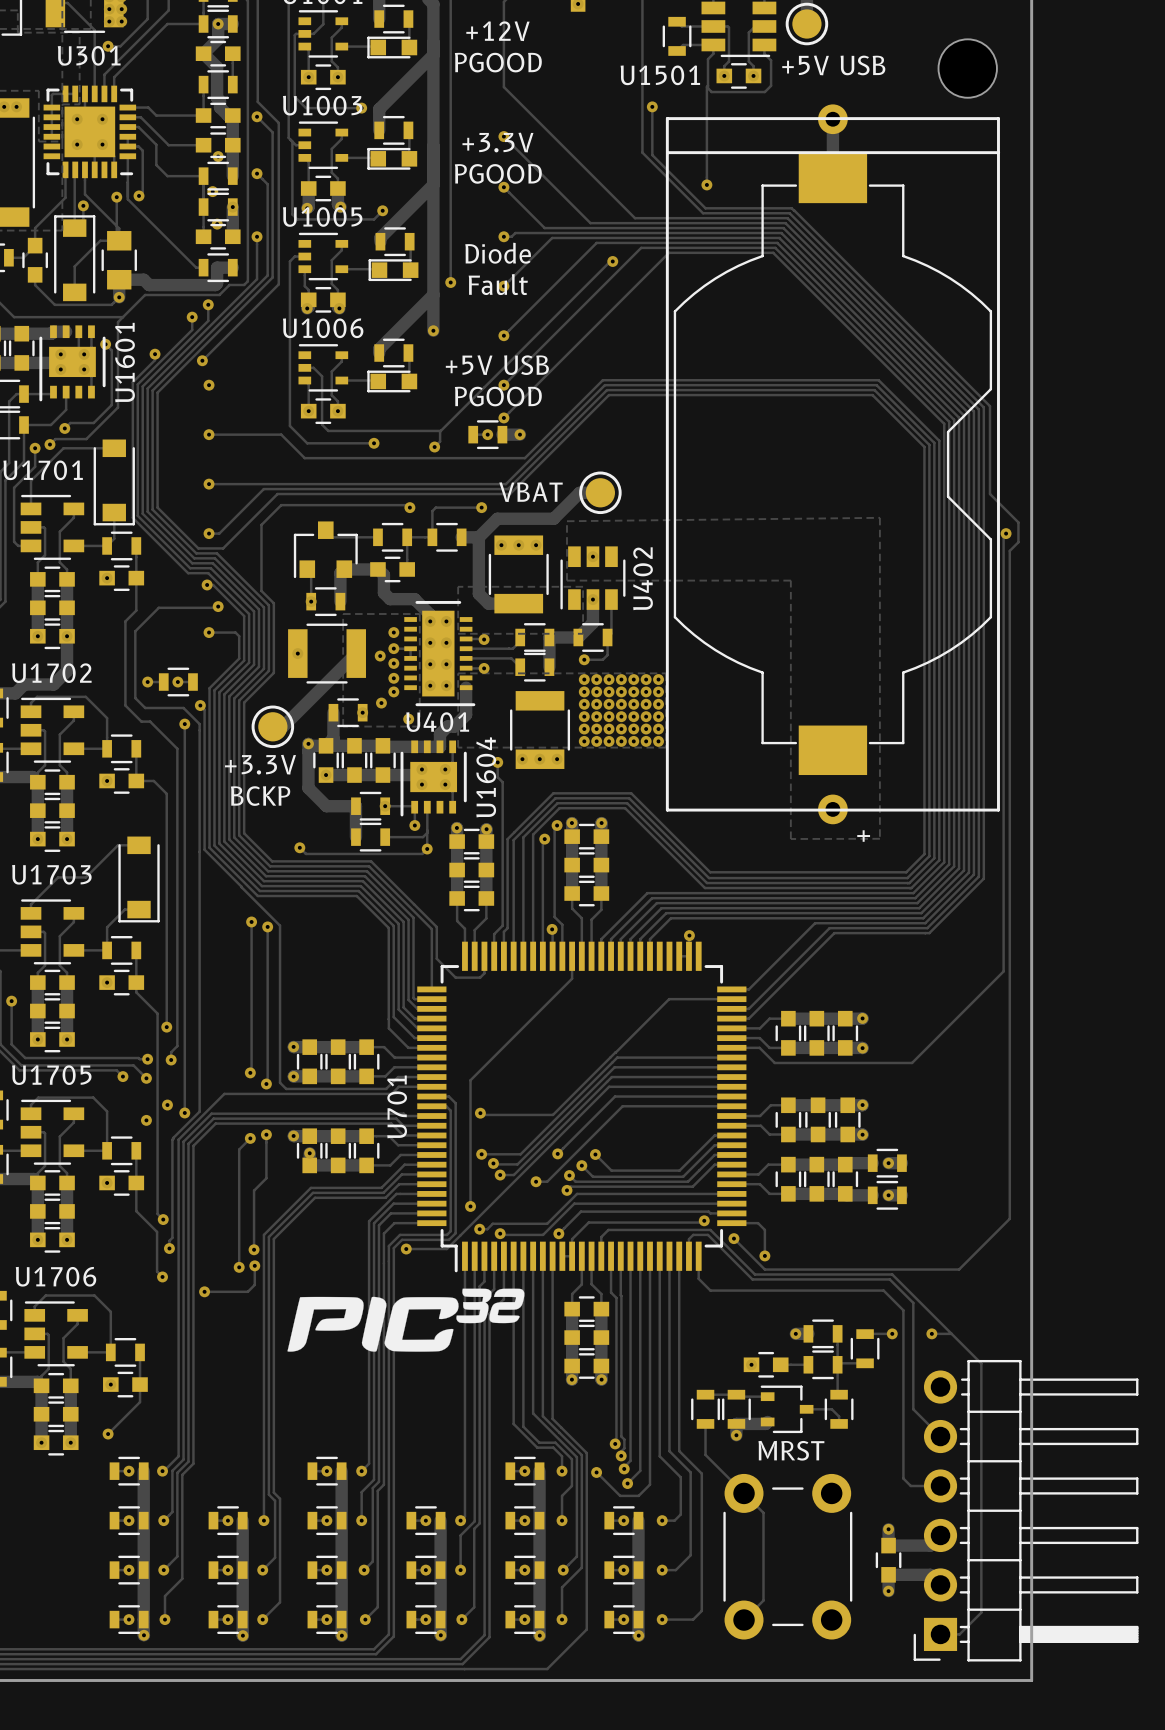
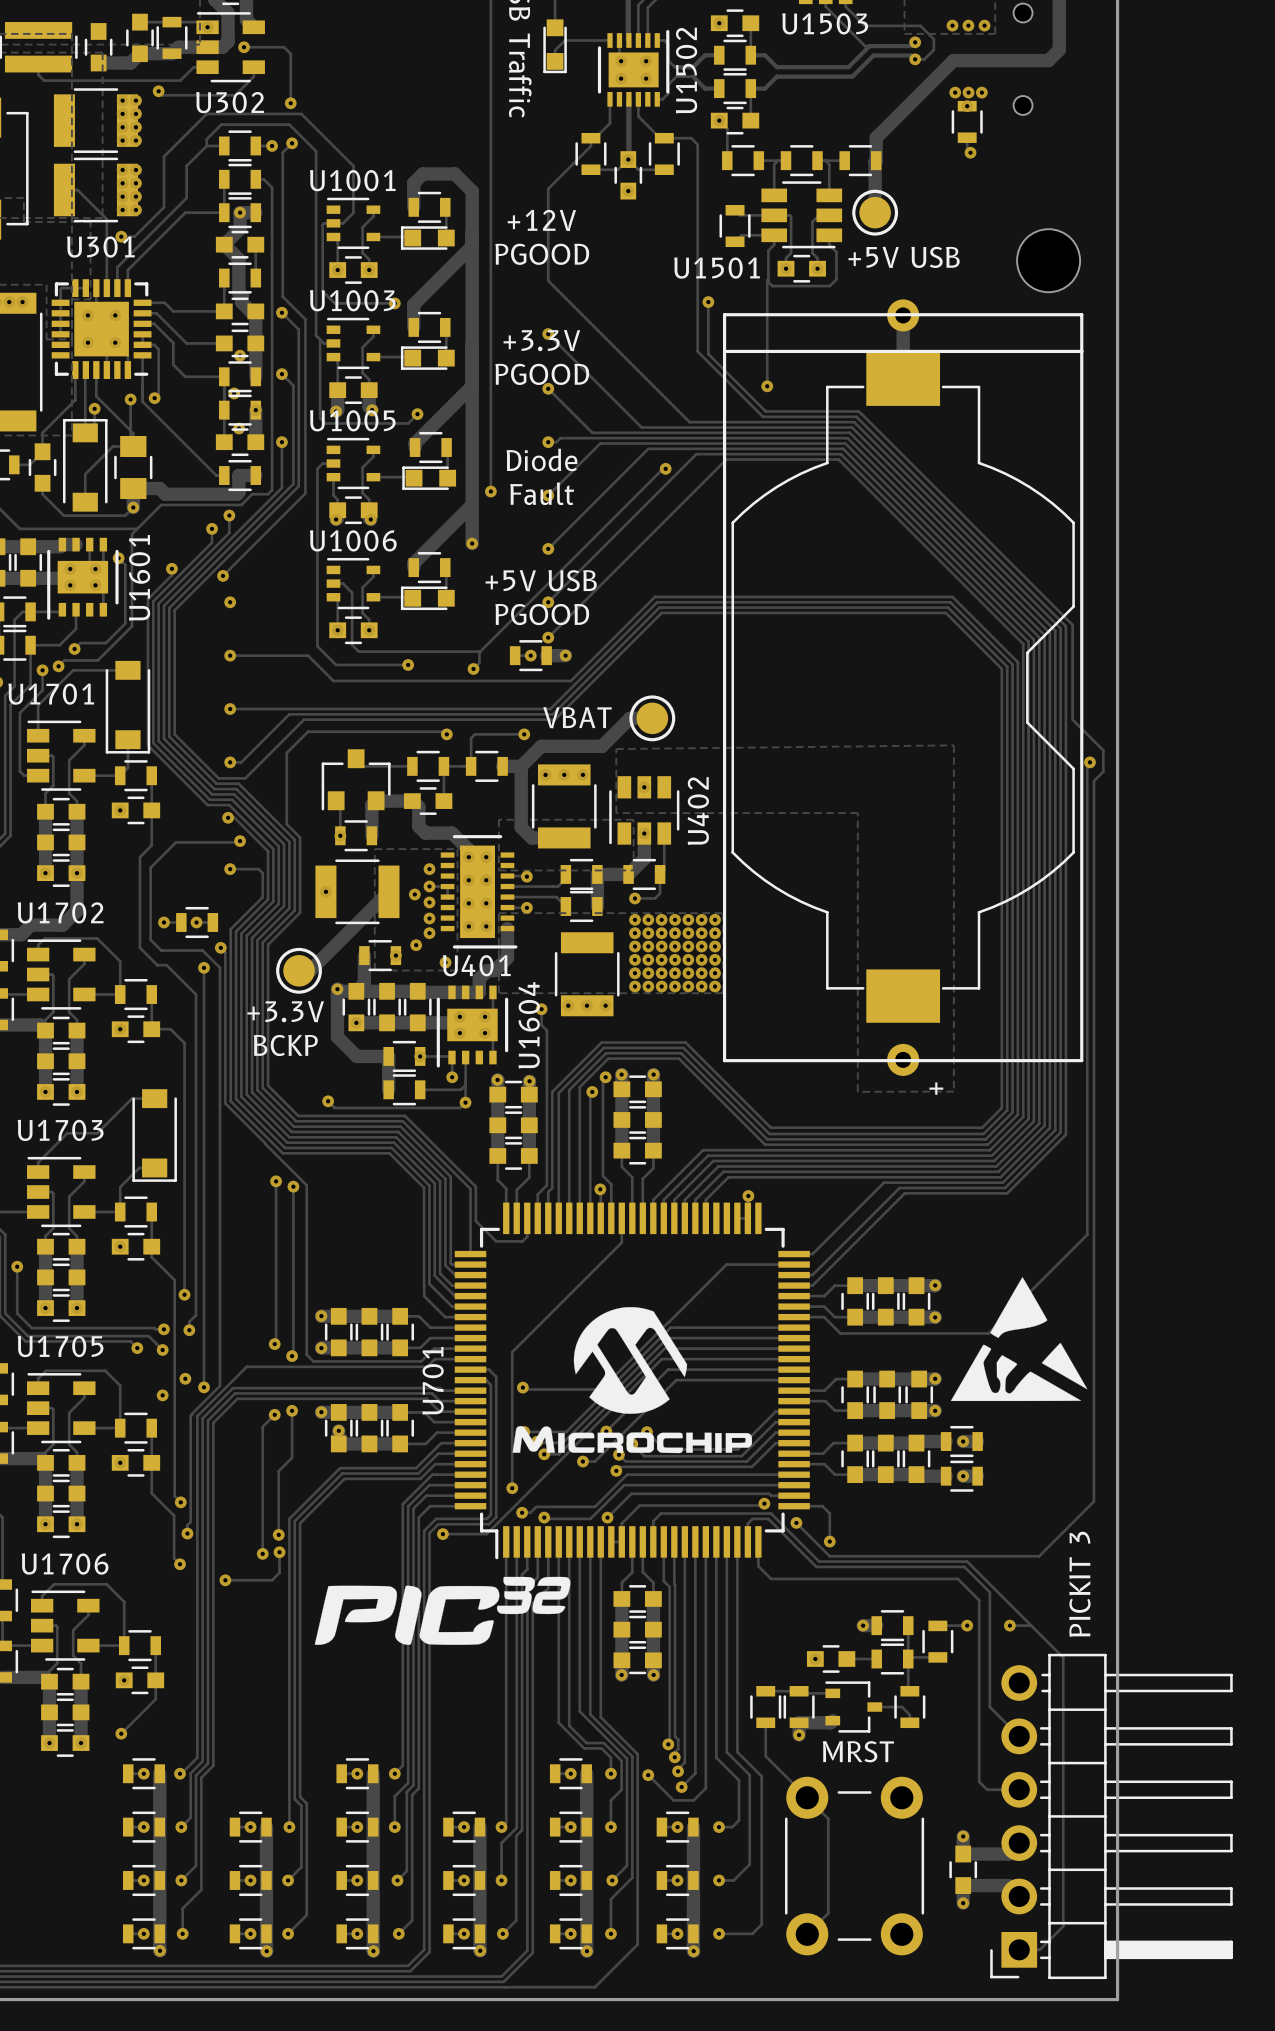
drawing: none -> [950, 1277, 1088, 1402]
drawing: none -> [512, 1307, 753, 1454]
text: none -> PICKIT 3 (1079, 1584)

